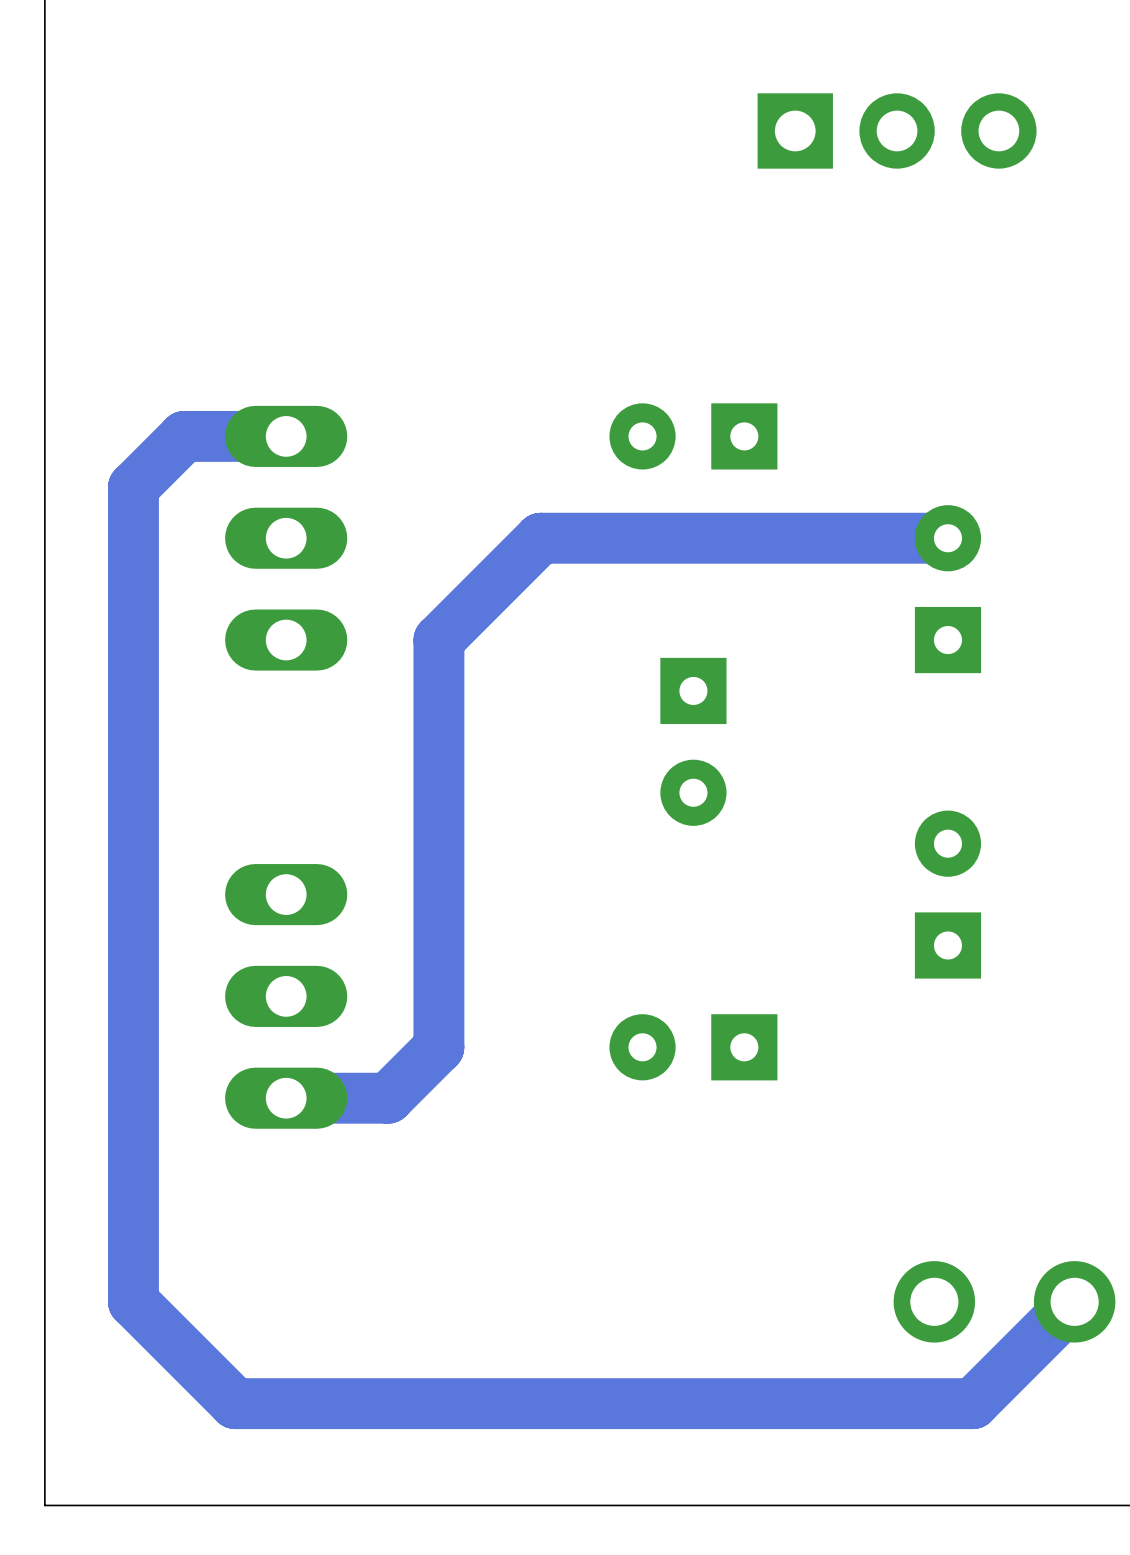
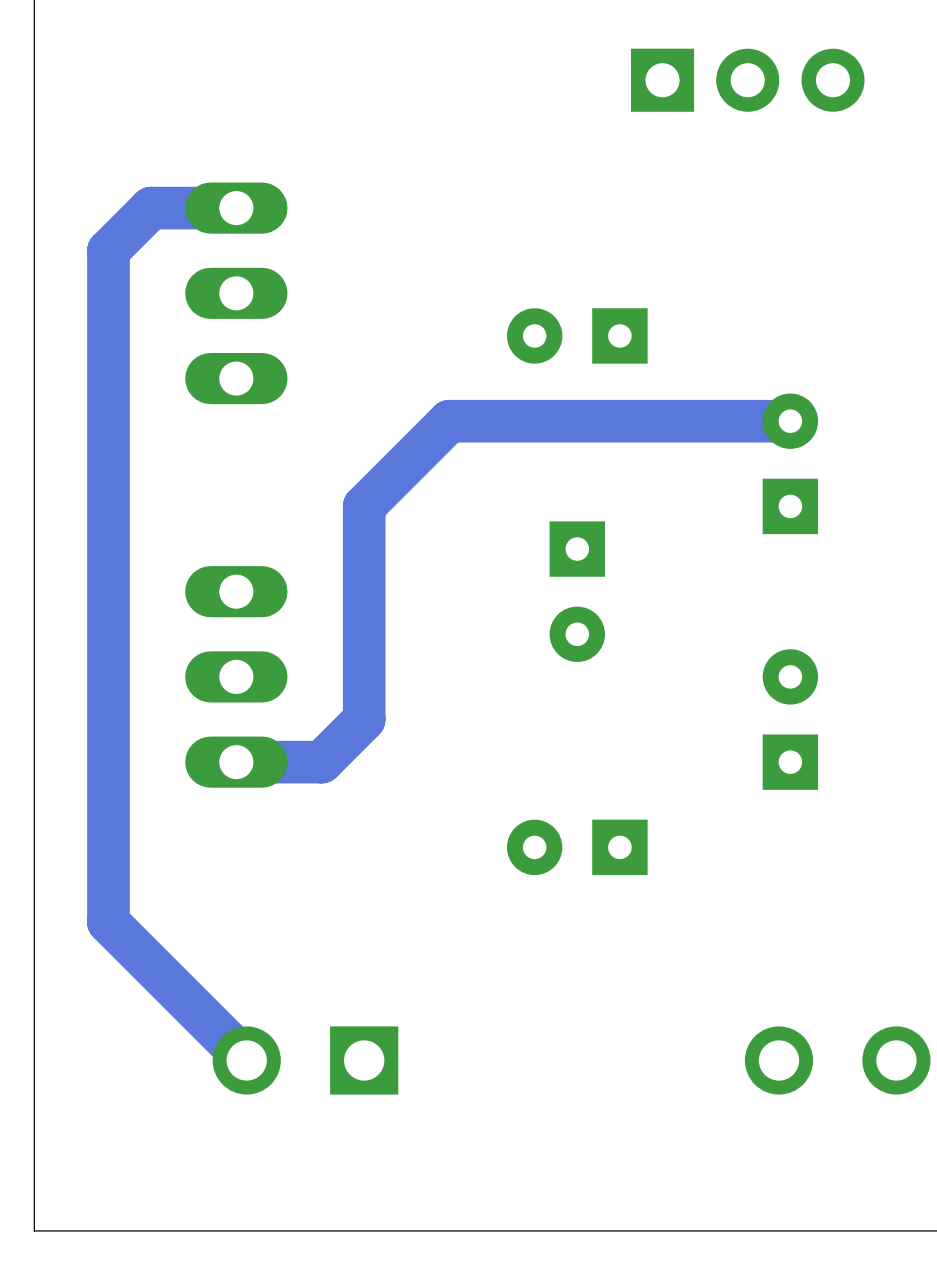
part: none -> (236, 293)
track: (286, 436) (184, 436) (133, 487) -> (236, 208) (151, 208) (108, 250) (108, 378)
part: (286, 538) -> none
part: none -> (236, 676)
track: (438, 894) (438, 1047) (388, 1098) (286, 1098) -> (364, 719) (321, 762) (236, 762)
part: (286, 996) -> none
track: (133, 1136) (133, 1301) (235, 1403) (972, 1403) (1074, 1301) -> (108, 922) (246, 1060)
part: none -> (305, 1060)

